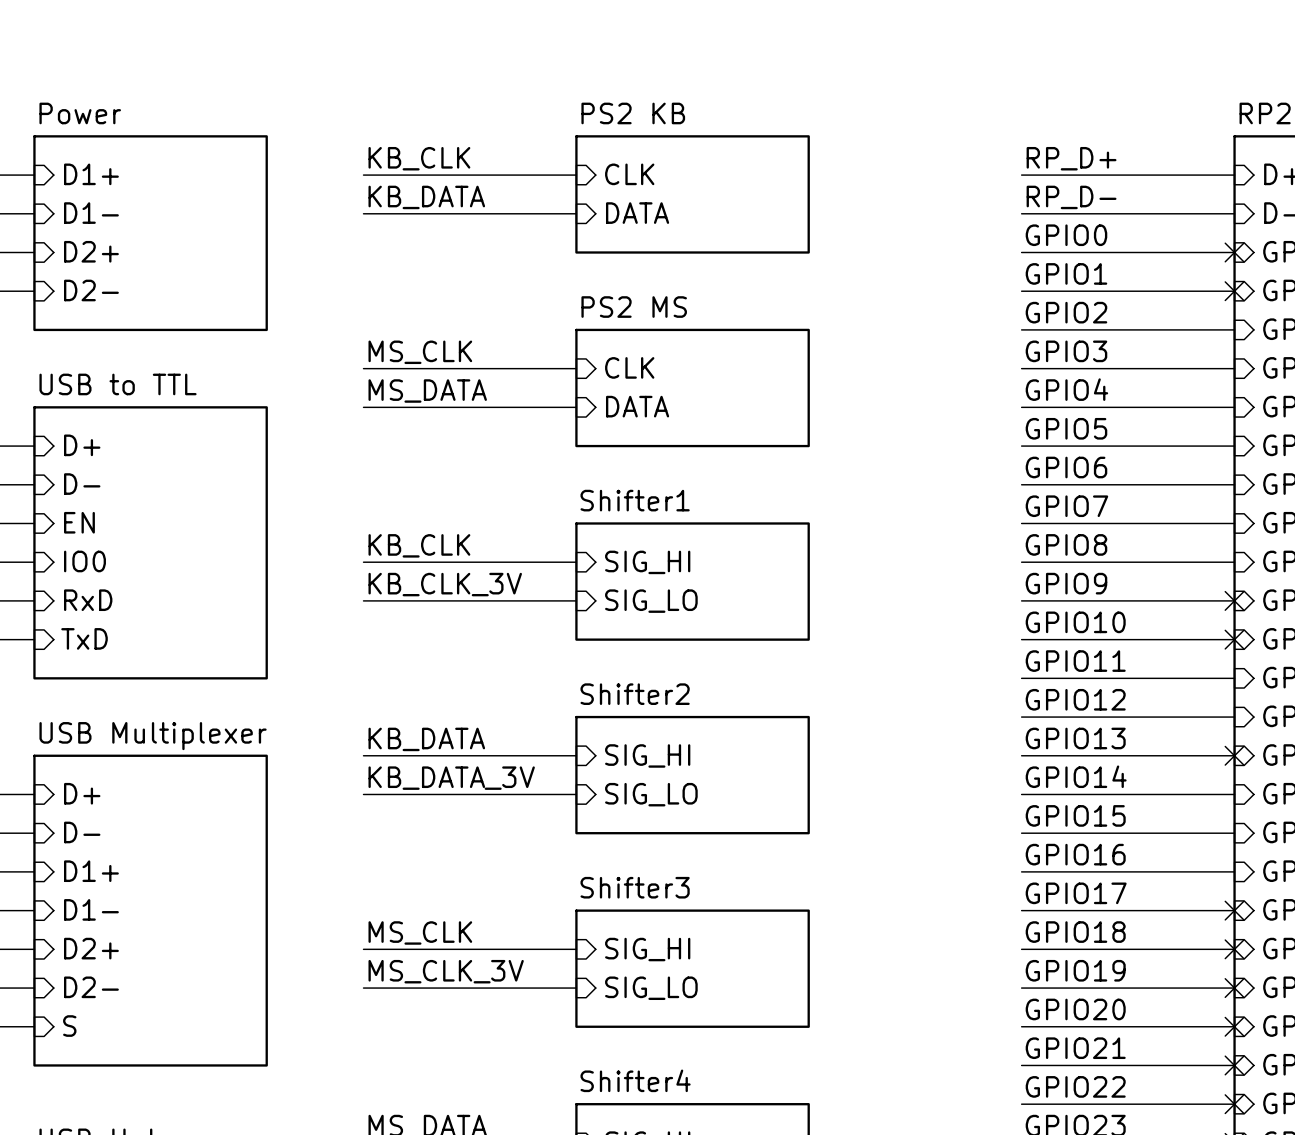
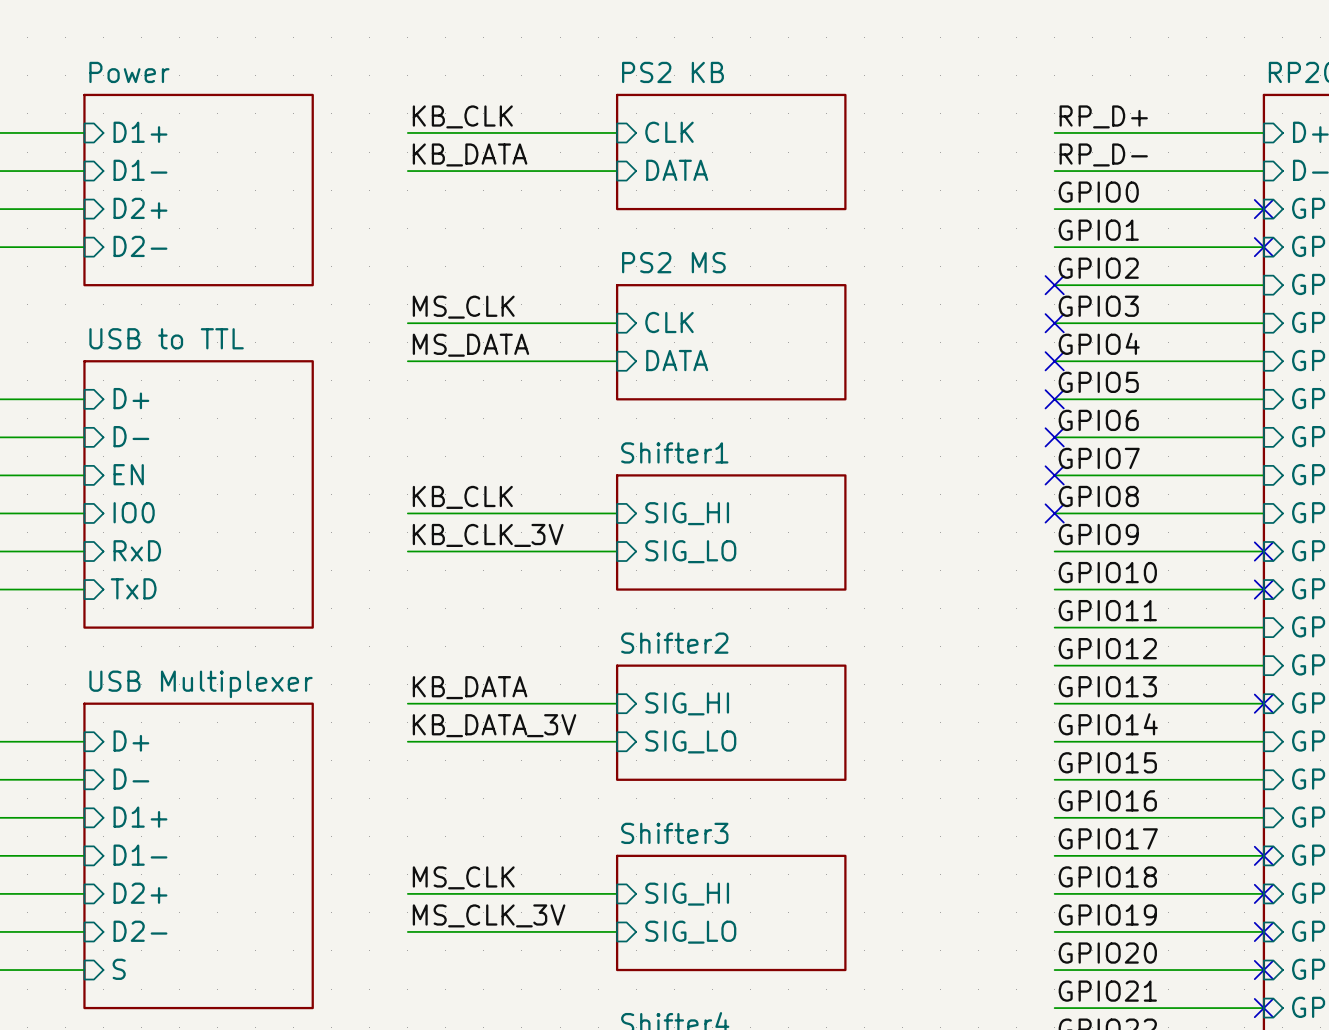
no-connect mark: none -> (1054, 285)
no-connect mark: none -> (1054, 323)
no-connect mark: none -> (1054, 361)
no-connect mark: none -> (1054, 399)
no-connect mark: none -> (1054, 437)
no-connect mark: none -> (1054, 475)
no-connect mark: none -> (1054, 513)

